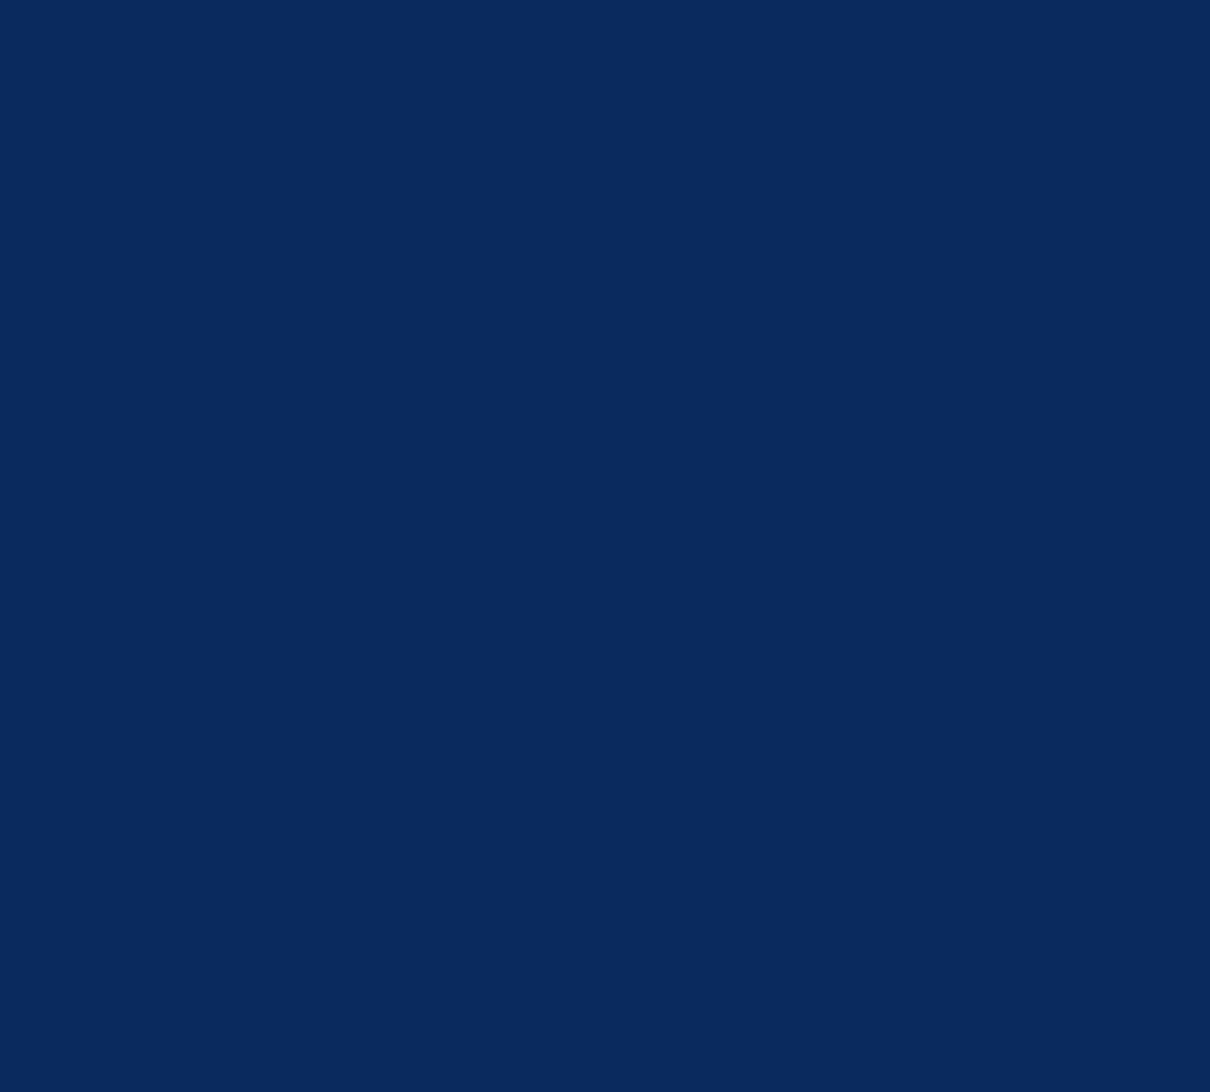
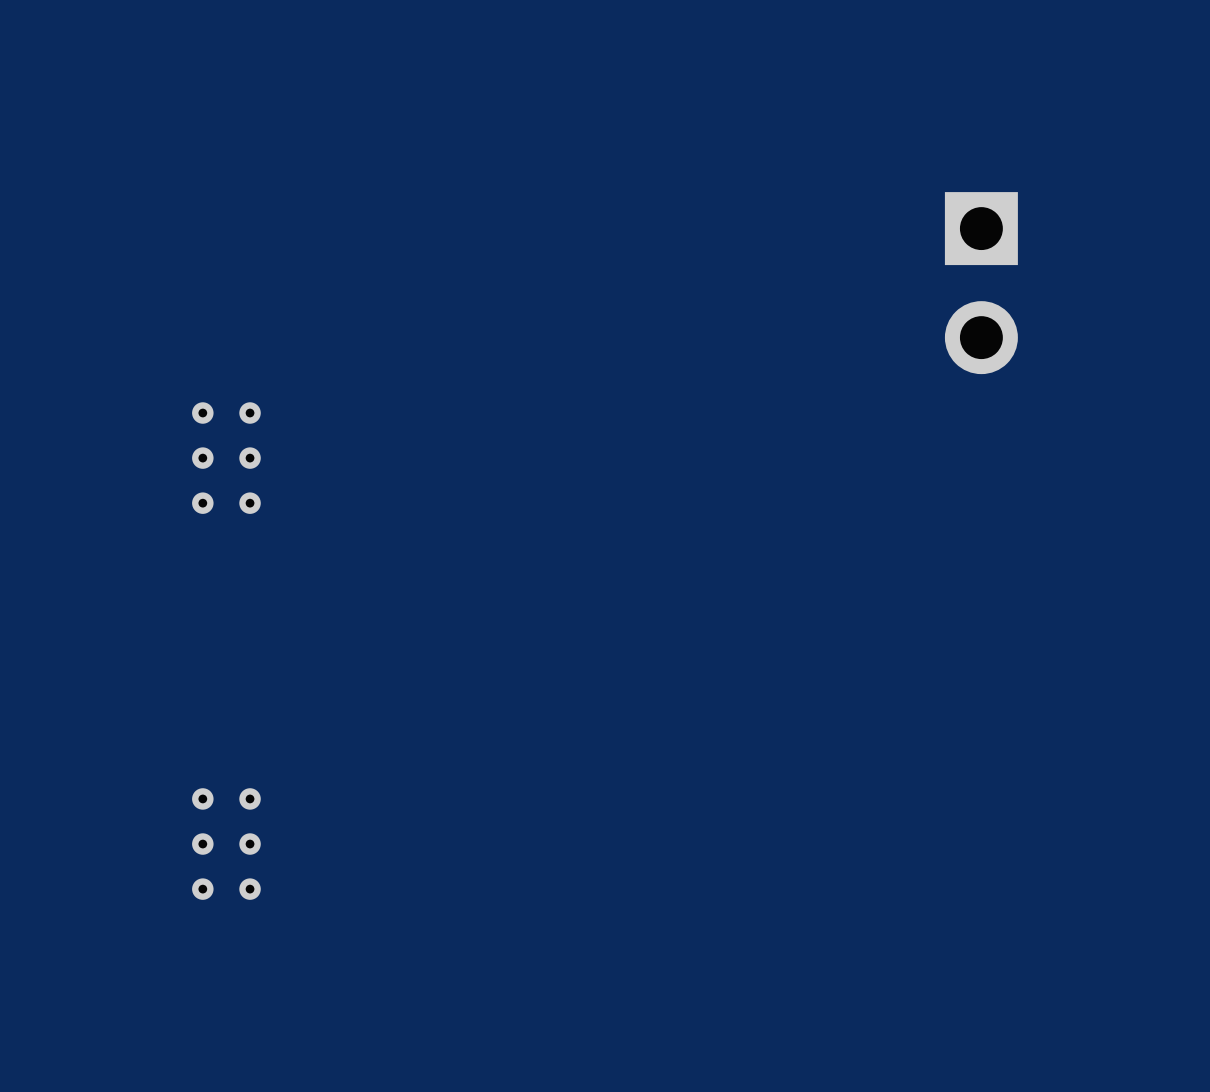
part: none -> (981, 283)
part: none -> (226, 458)
part: none -> (226, 844)

